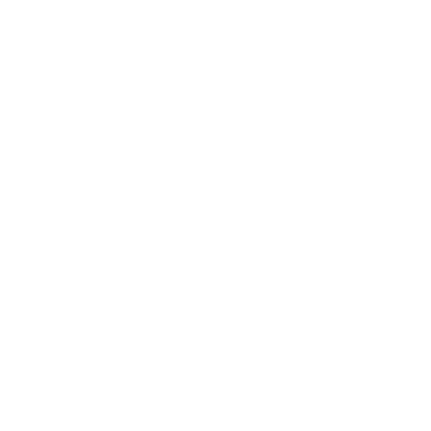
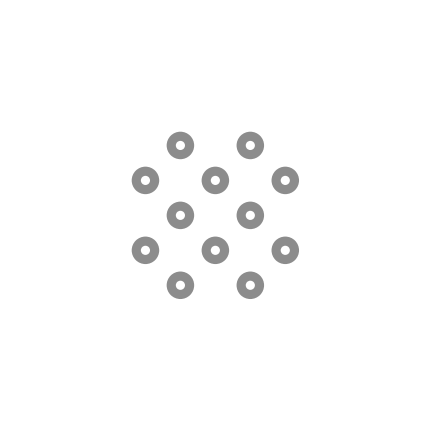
part: none -> (215, 215)

